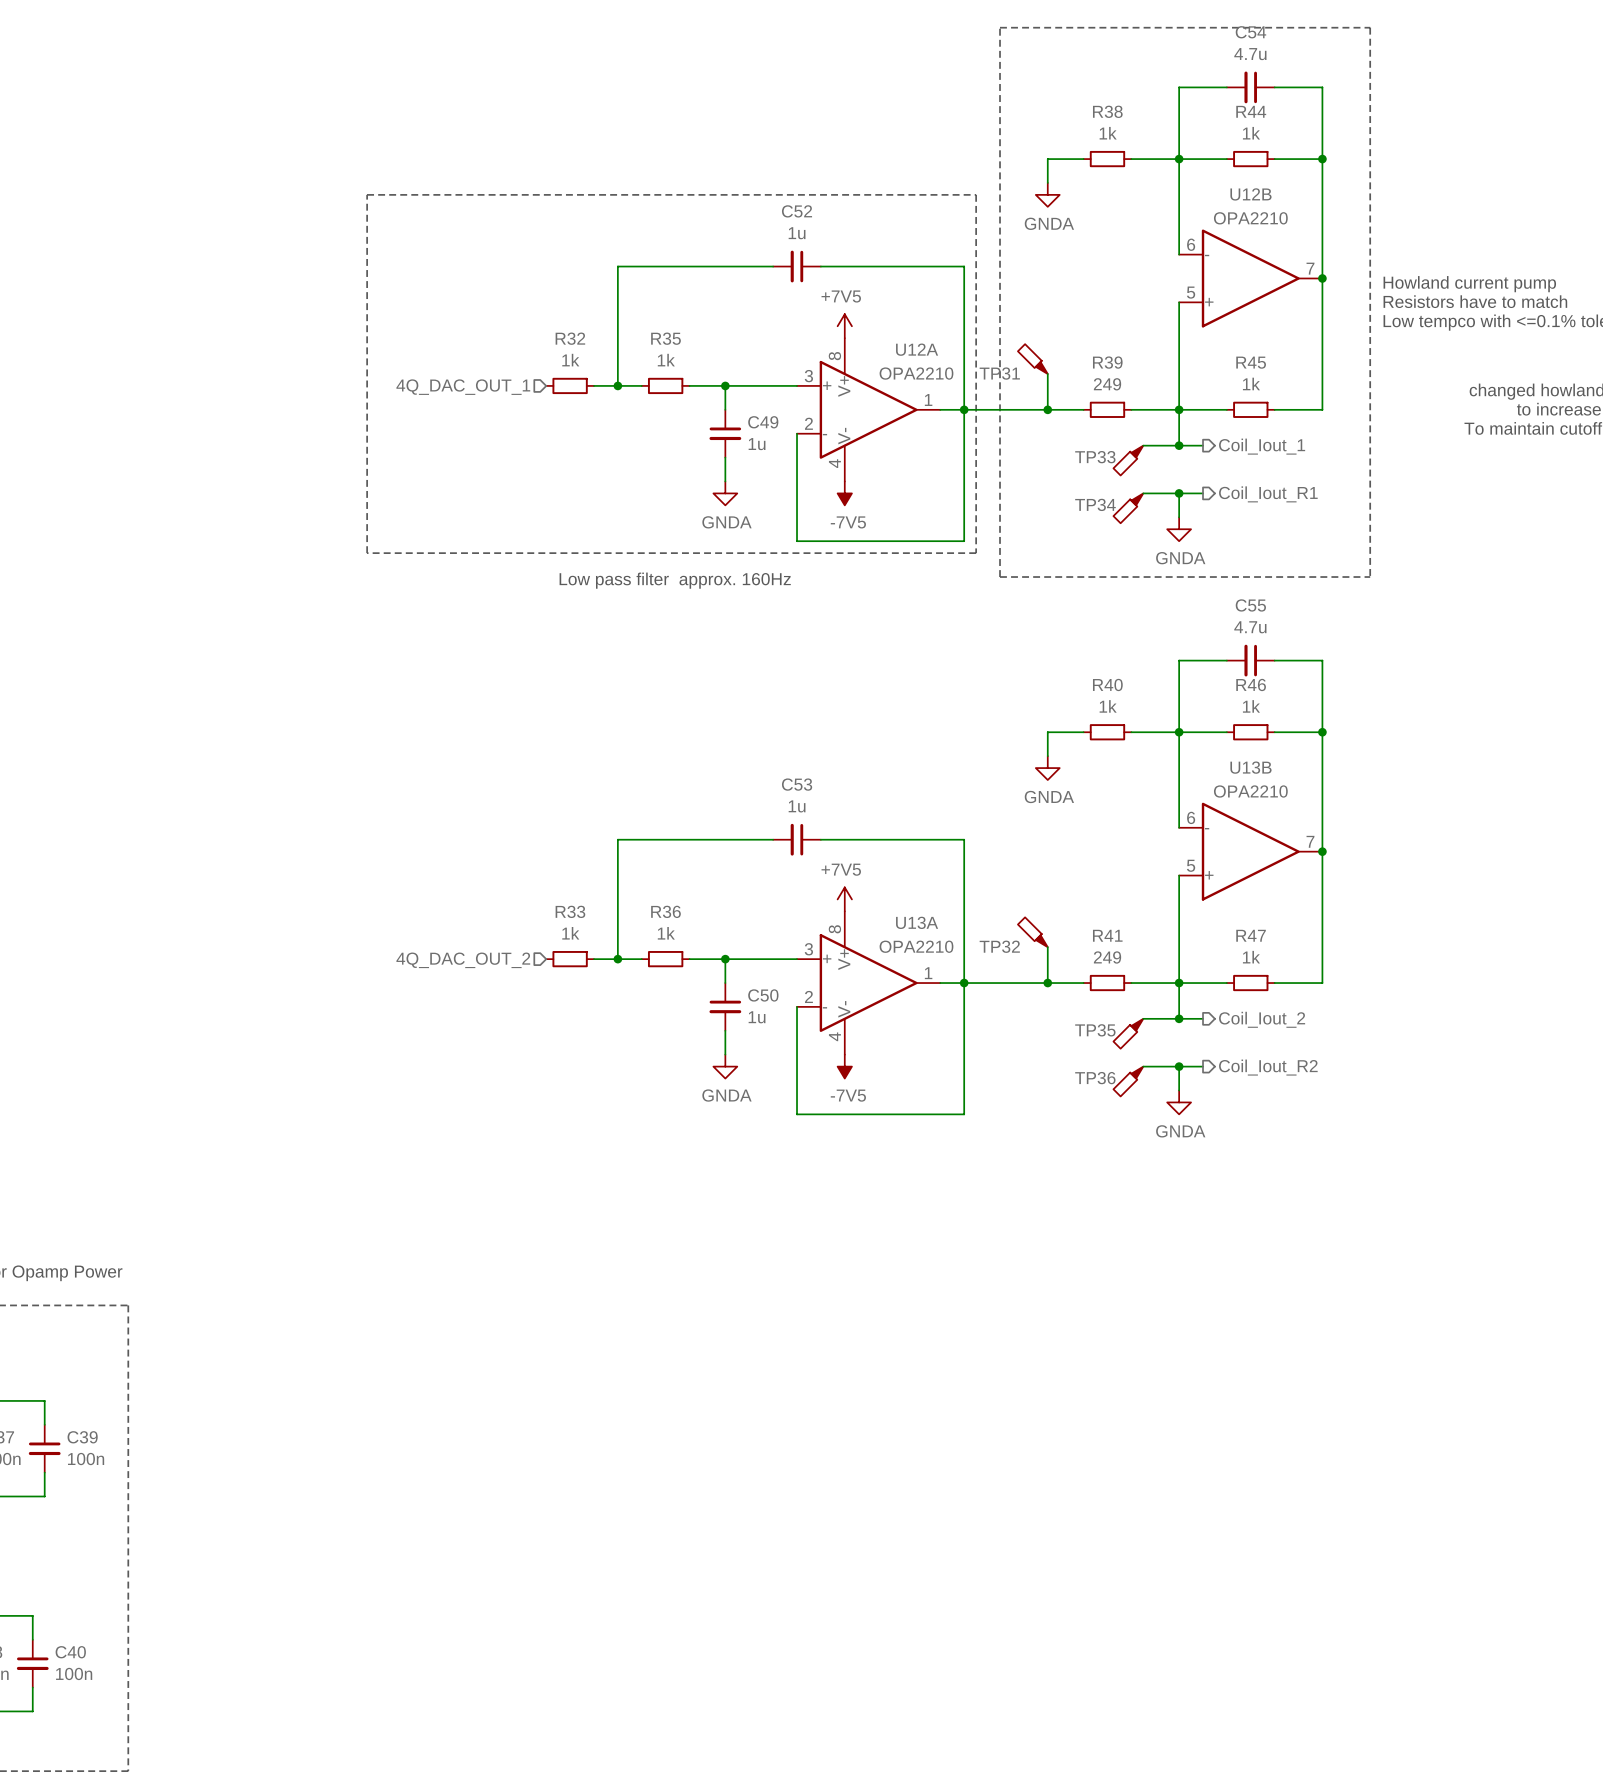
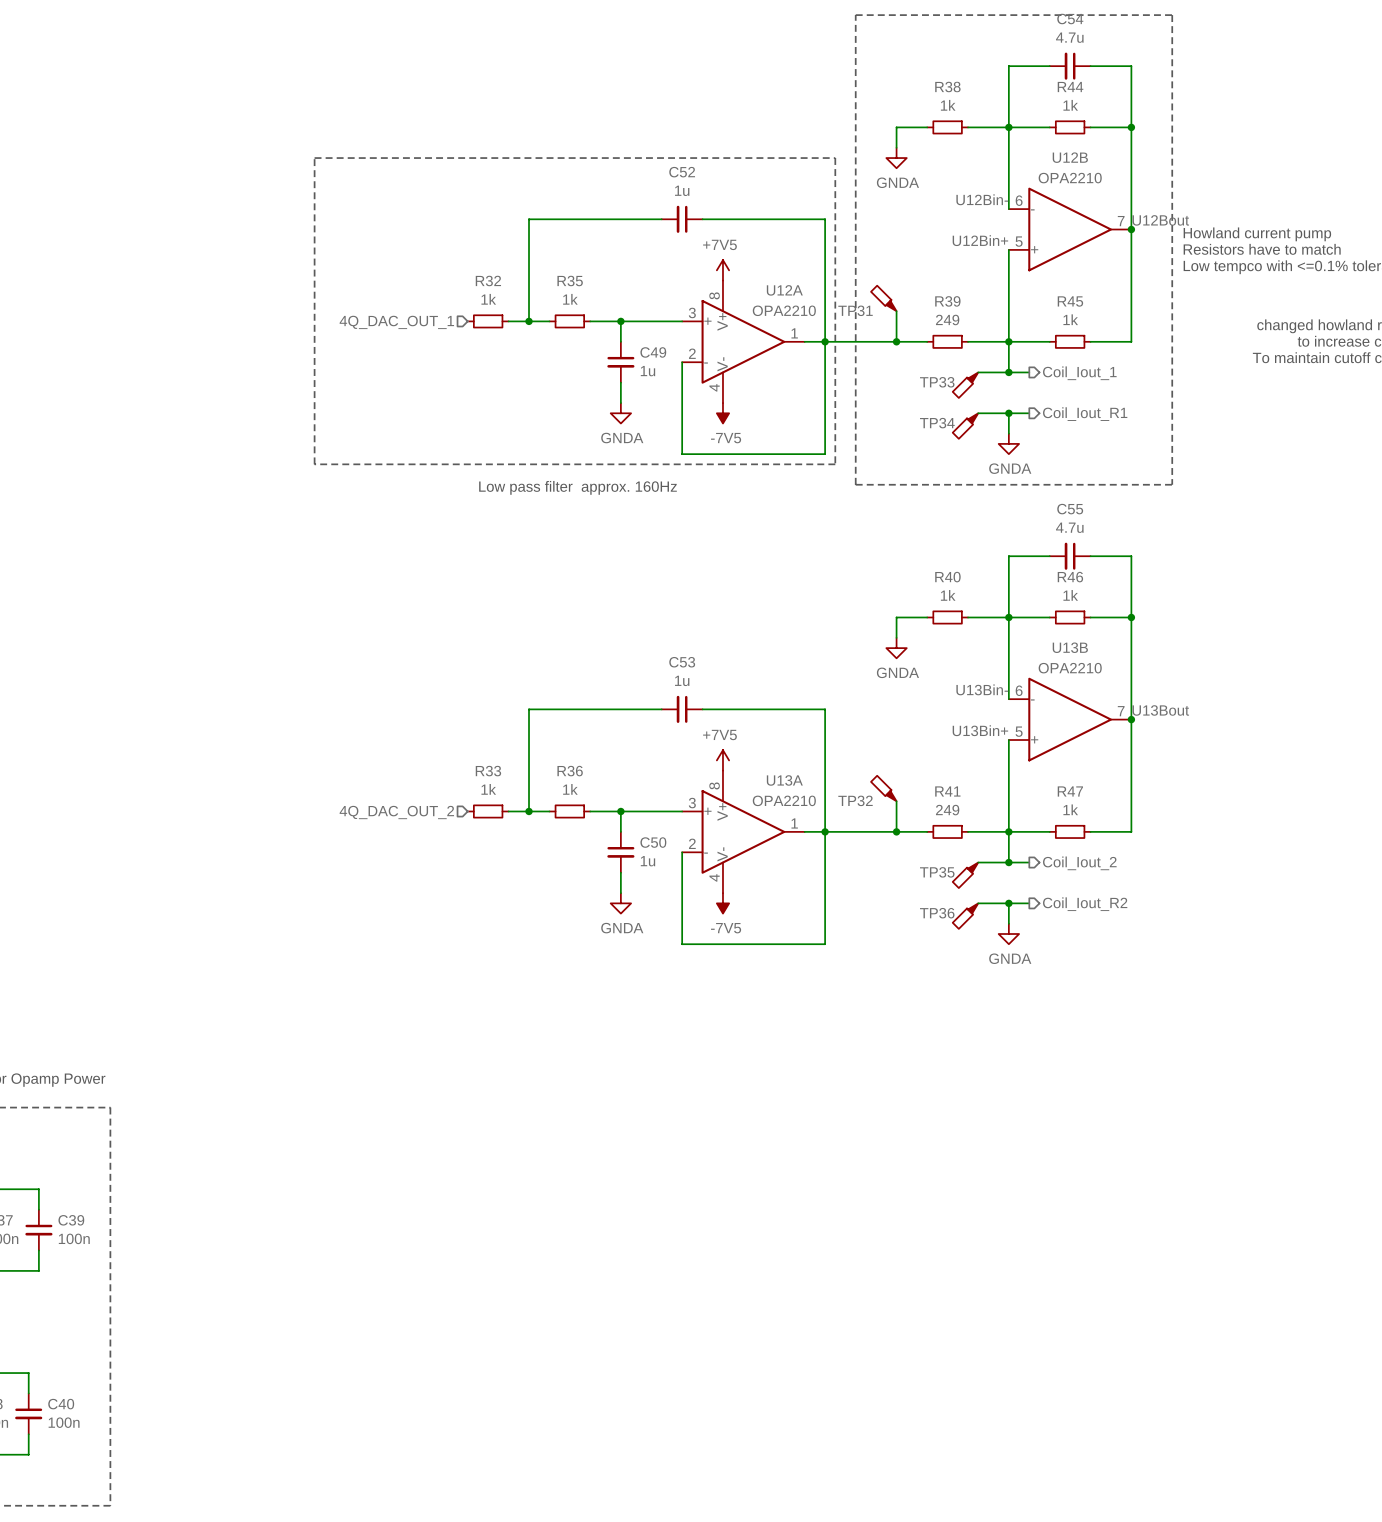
label: none -> U12Bin- (982, 199)
label: none -> U12Bout (1160, 220)
label: none -> U12Bin+ (980, 240)
label: none -> U13Bin- (982, 689)
label: none -> U13Bout (1160, 710)
label: none -> U13Bin+ (980, 730)

